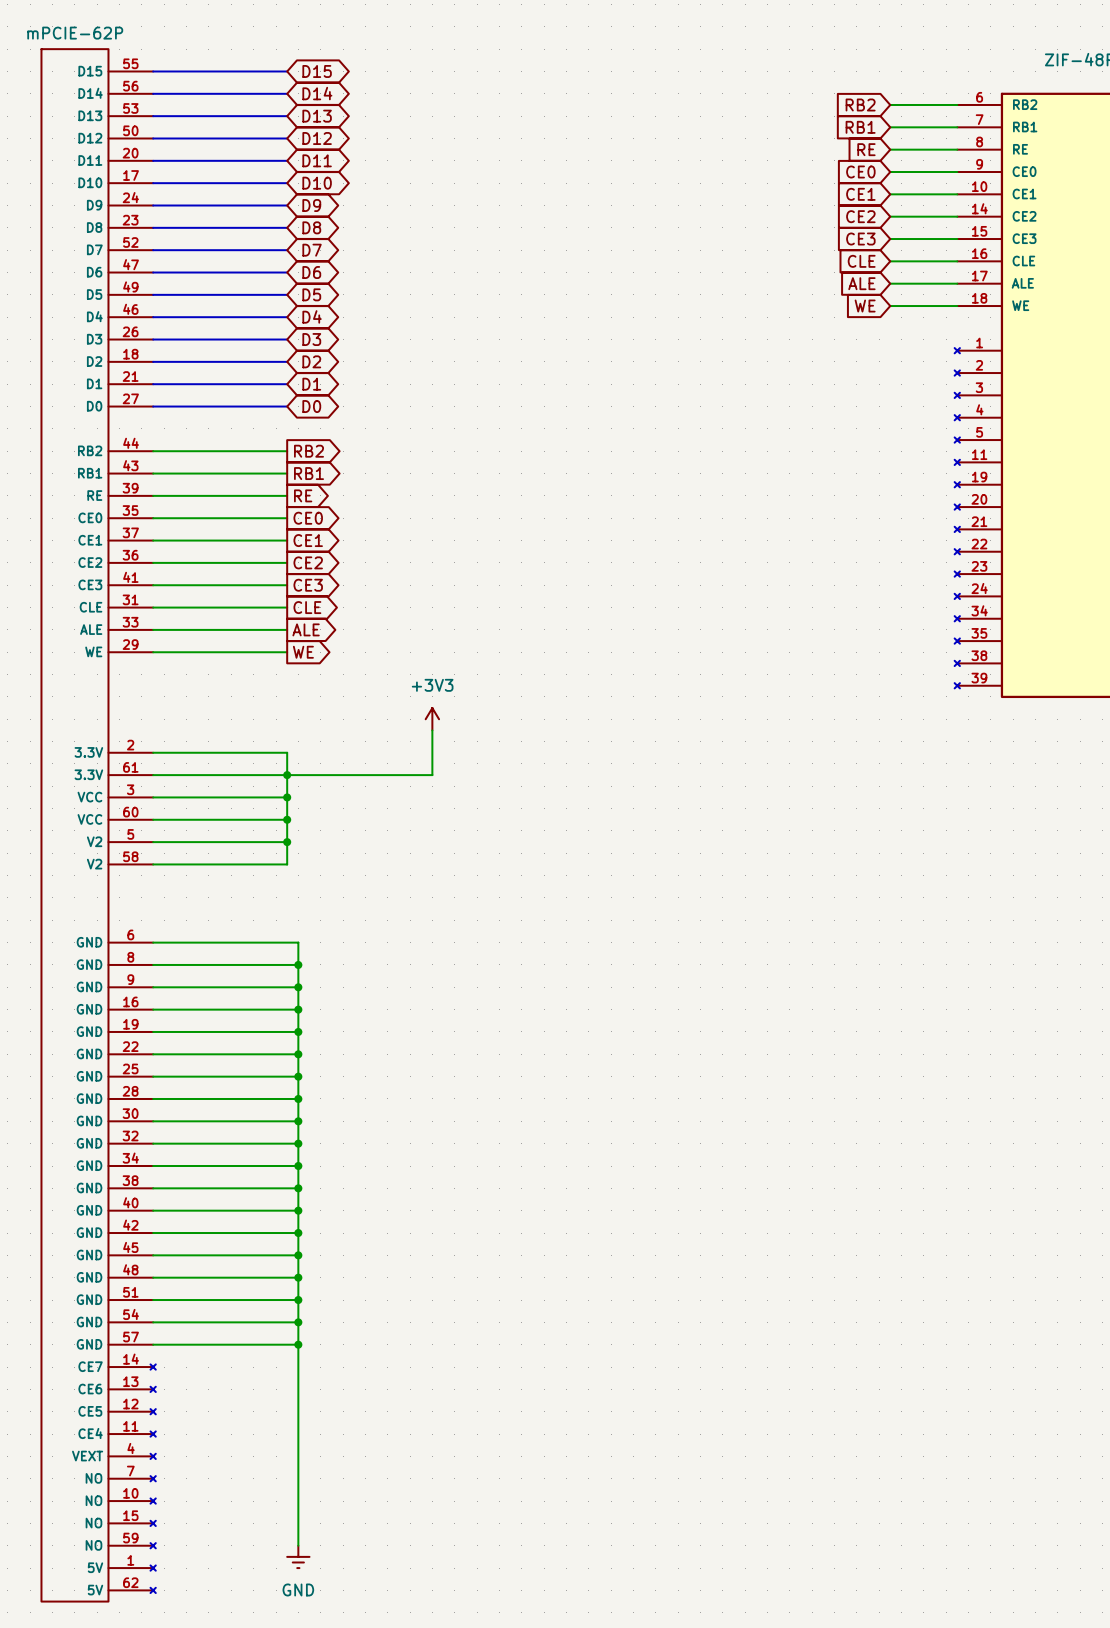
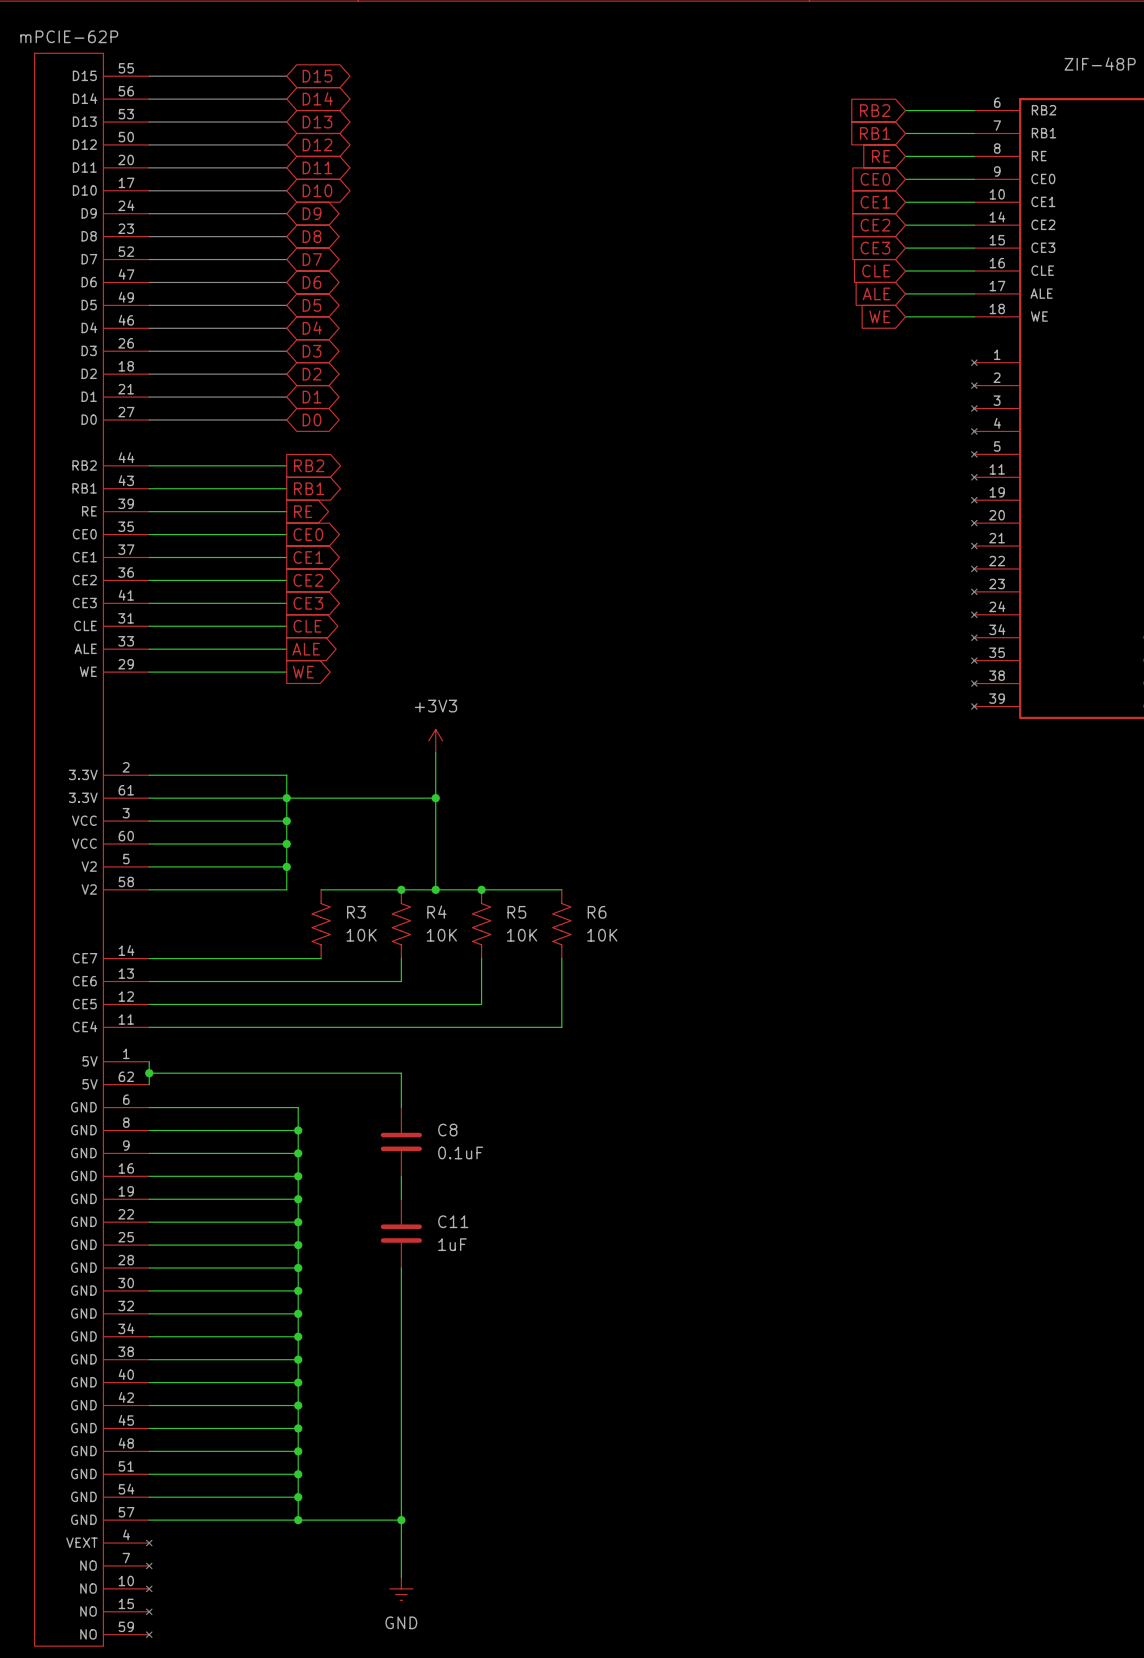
mPCIE-62P symbol: [41, 49, 156, 1602] -> [34, 53, 152, 1647]
wire: none -> (435, 798) (435, 889)
junction: none -> (435, 798)
wire: none -> (321, 889) (561, 889)
junction: none -> (401, 889)
junction: none -> (435, 889)
junction: none -> (481, 889)
R3: none -> 10K (321, 924)
R4: none -> 10K (401, 924)
R5: none -> 10K (481, 924)
R6: none -> 10K (561, 924)
wire: none -> (149, 958) (321, 958)
wire: none -> (401, 958) (401, 981) (149, 981)
wire: none -> (481, 958) (481, 1004) (149, 1004)
wire: none -> (561, 958) (561, 1027) (149, 1027)
wire: (153, 942) (298, 942) (298, 1076) -> none
wire: (153, 964) (298, 964) -> none
junction: (298, 964) -> none
wire: (153, 987) (298, 987) -> none
junction: (298, 987) -> none
wire: (153, 1009) (298, 1009) -> none
junction: (298, 1009) -> none
wire: (153, 1031) (298, 1031) -> (149, 1061) (149, 1084)
junction: (298, 1031) -> none
wire: none -> (149, 1073) (401, 1073) (401, 1107)
junction: none -> (149, 1073)
wire: (153, 1054) (298, 1054) -> none
junction: (298, 1054) -> none
junction: (298, 1076) -> none
C8: none -> 0.1uF (401, 1141)
wire: none -> (401, 1176) (401, 1199)
C11: none -> 1uF (401, 1233)
wire: none -> (401, 1268) (401, 1577)
wire: none -> (149, 1405) (298, 1405)
junction: none -> (298, 1405)
wire: none -> (149, 1428) (298, 1428)
junction: none -> (298, 1428)
wire: none -> (149, 1451) (298, 1451)
junction: none -> (298, 1451)
wire: none -> (149, 1474) (298, 1474)
junction: none -> (298, 1474)
wire: none -> (149, 1497) (298, 1497)
junction: none -> (298, 1497)
wire: none -> (149, 1520) (401, 1520)
wire: (298, 1478) (298, 1545) -> none
junction: none -> (298, 1520)
junction: none -> (401, 1520)
power symbol position: GND (298, 1556) -> GND (401, 1588)

